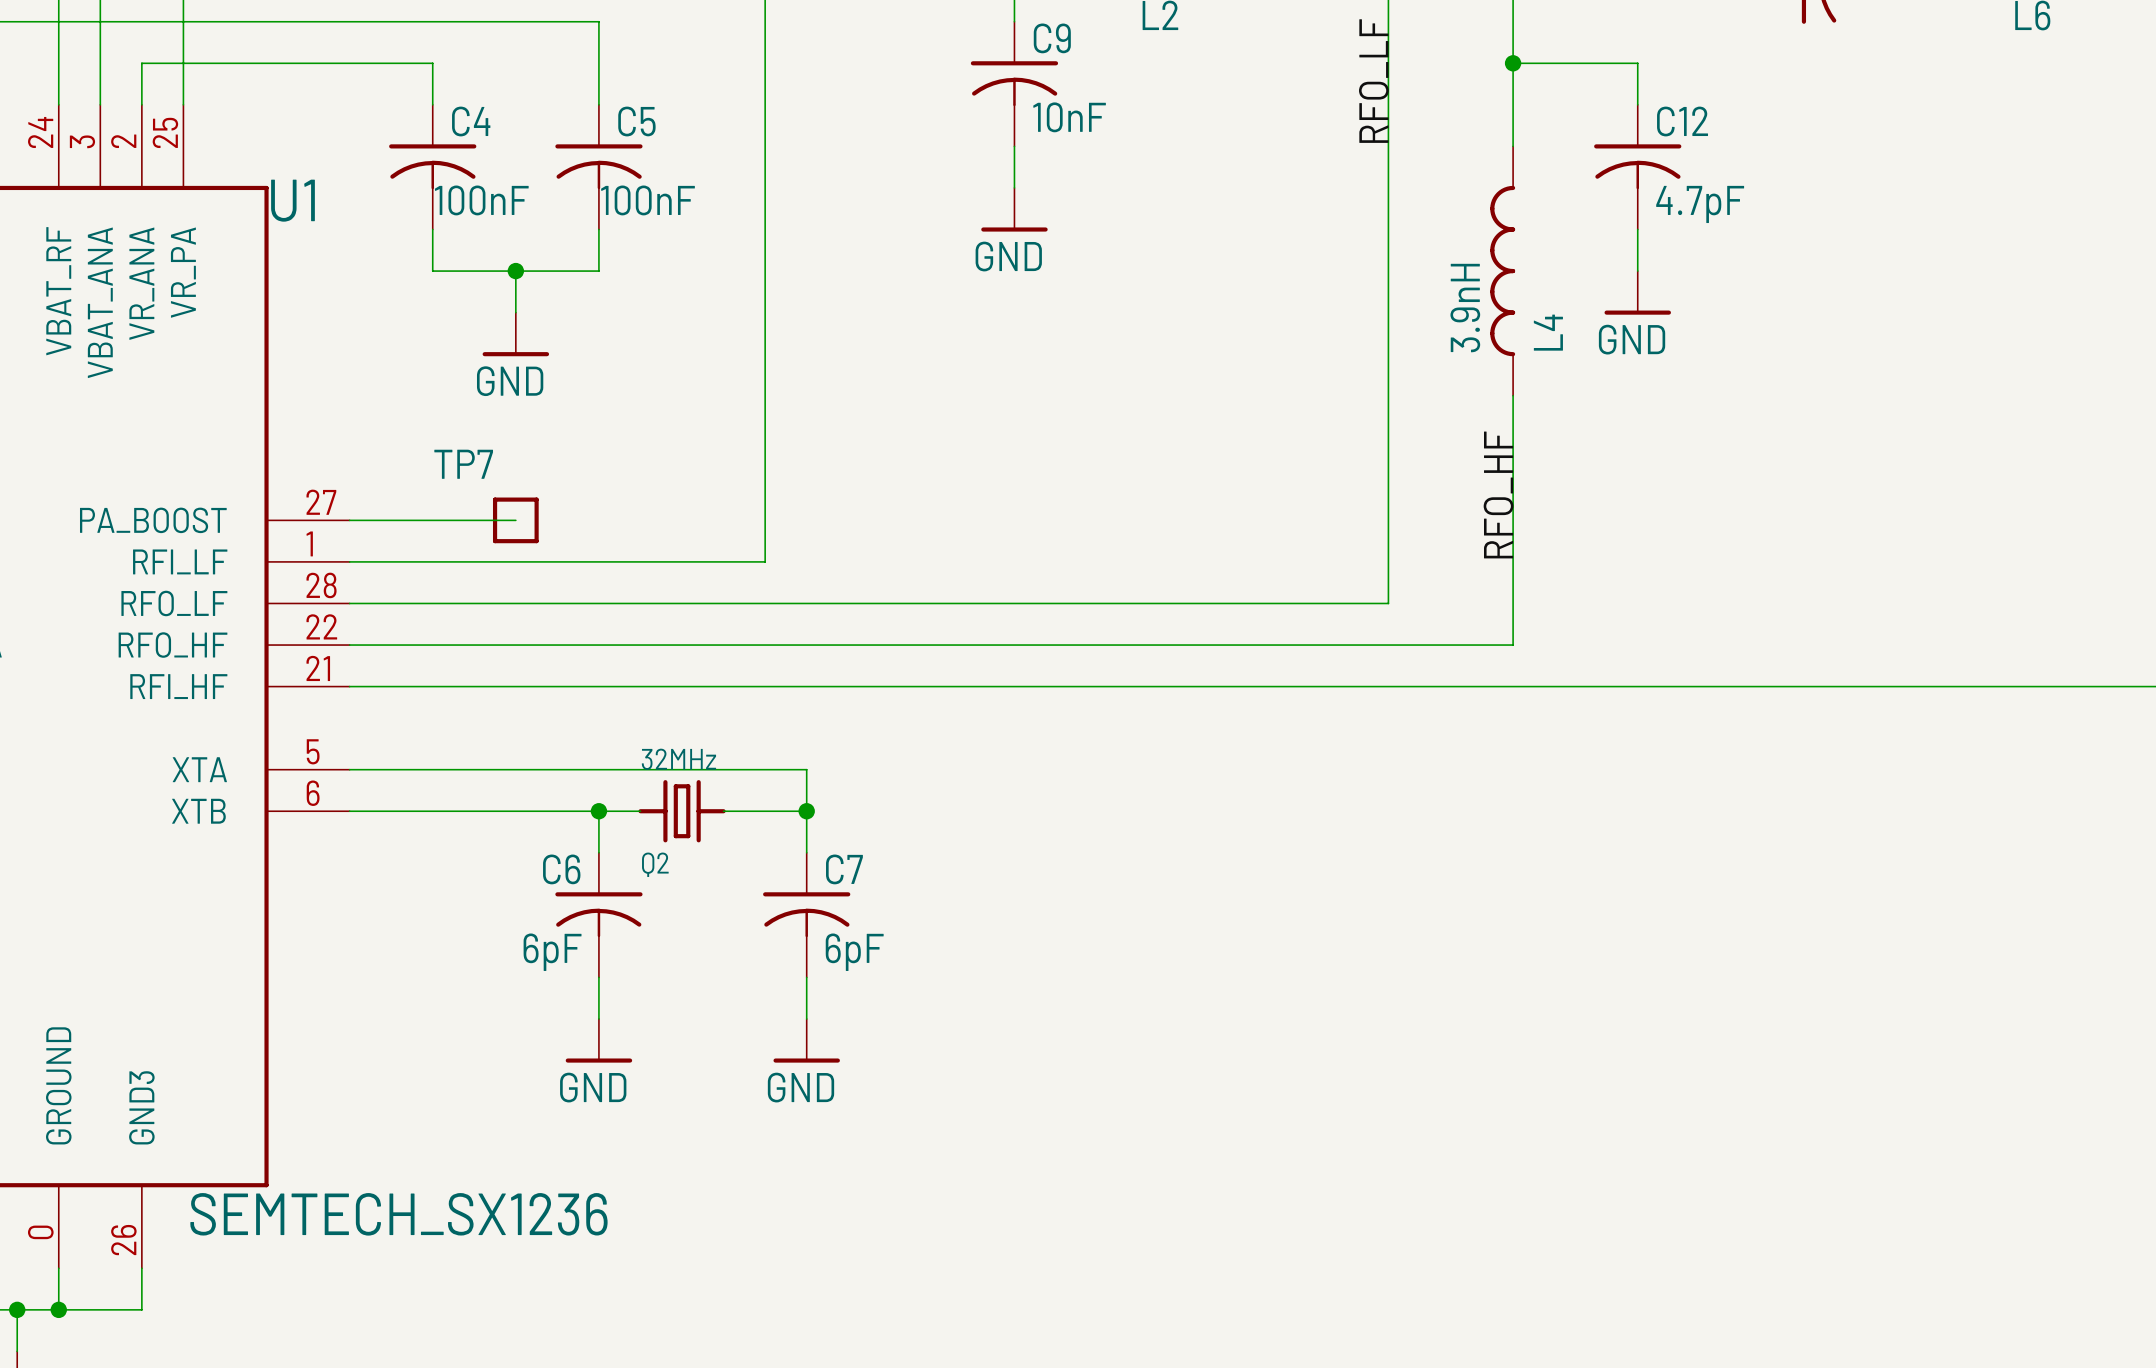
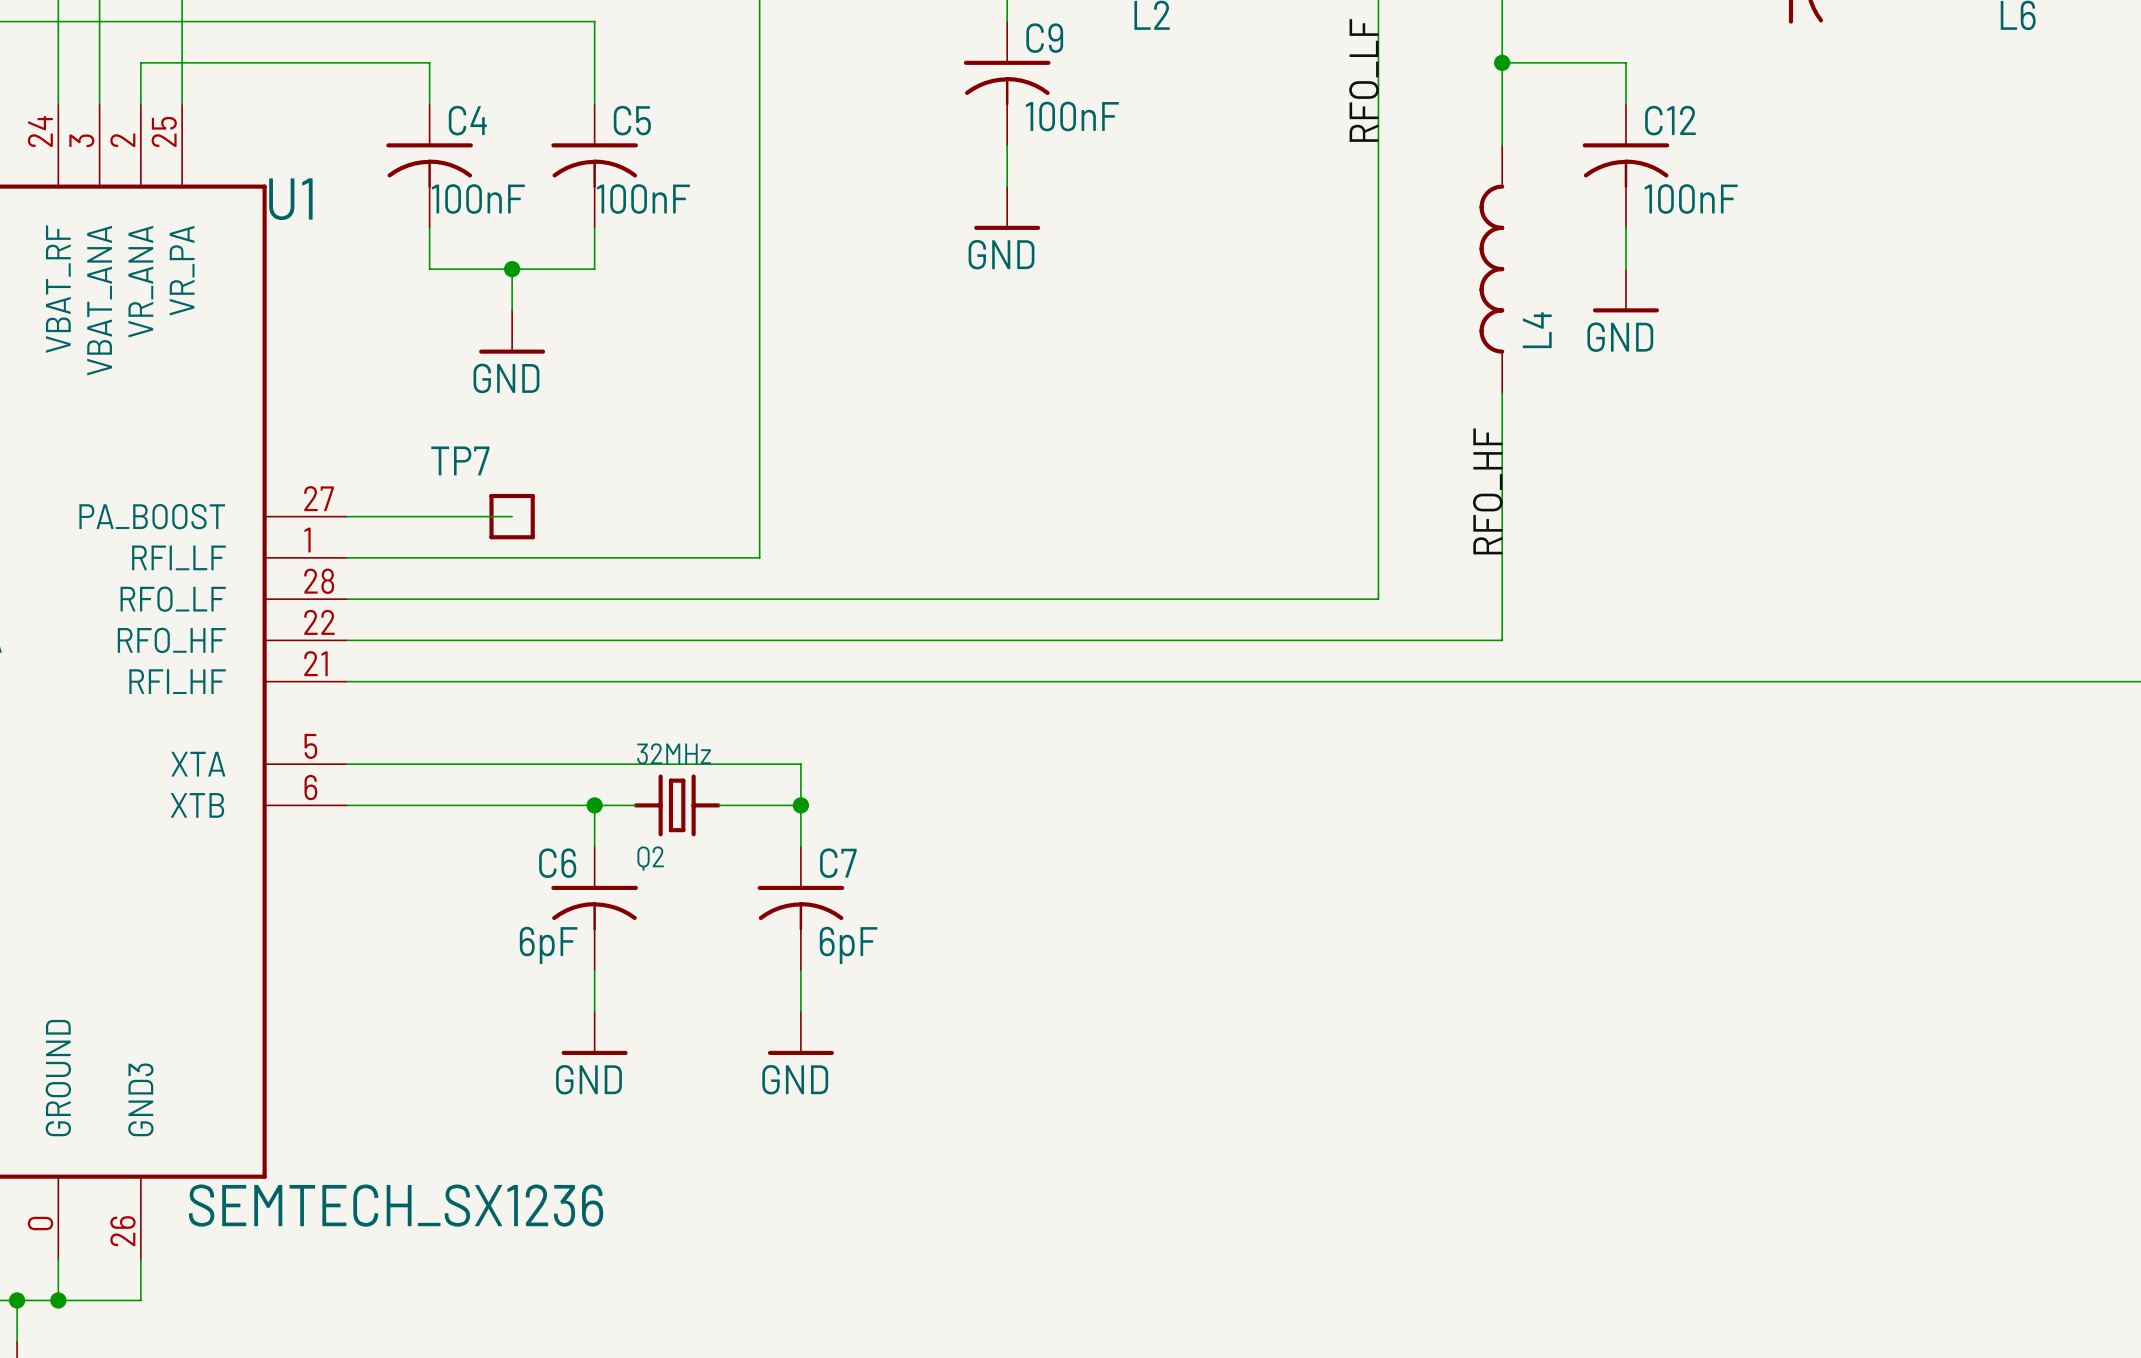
C9 value: 10nF (1069, 117) -> 100nF (1072, 116)
C12 value: 4.7pF (1700, 204) -> 100nF (1691, 199)
L4 value: 3.9nH (1465, 308) -> none

